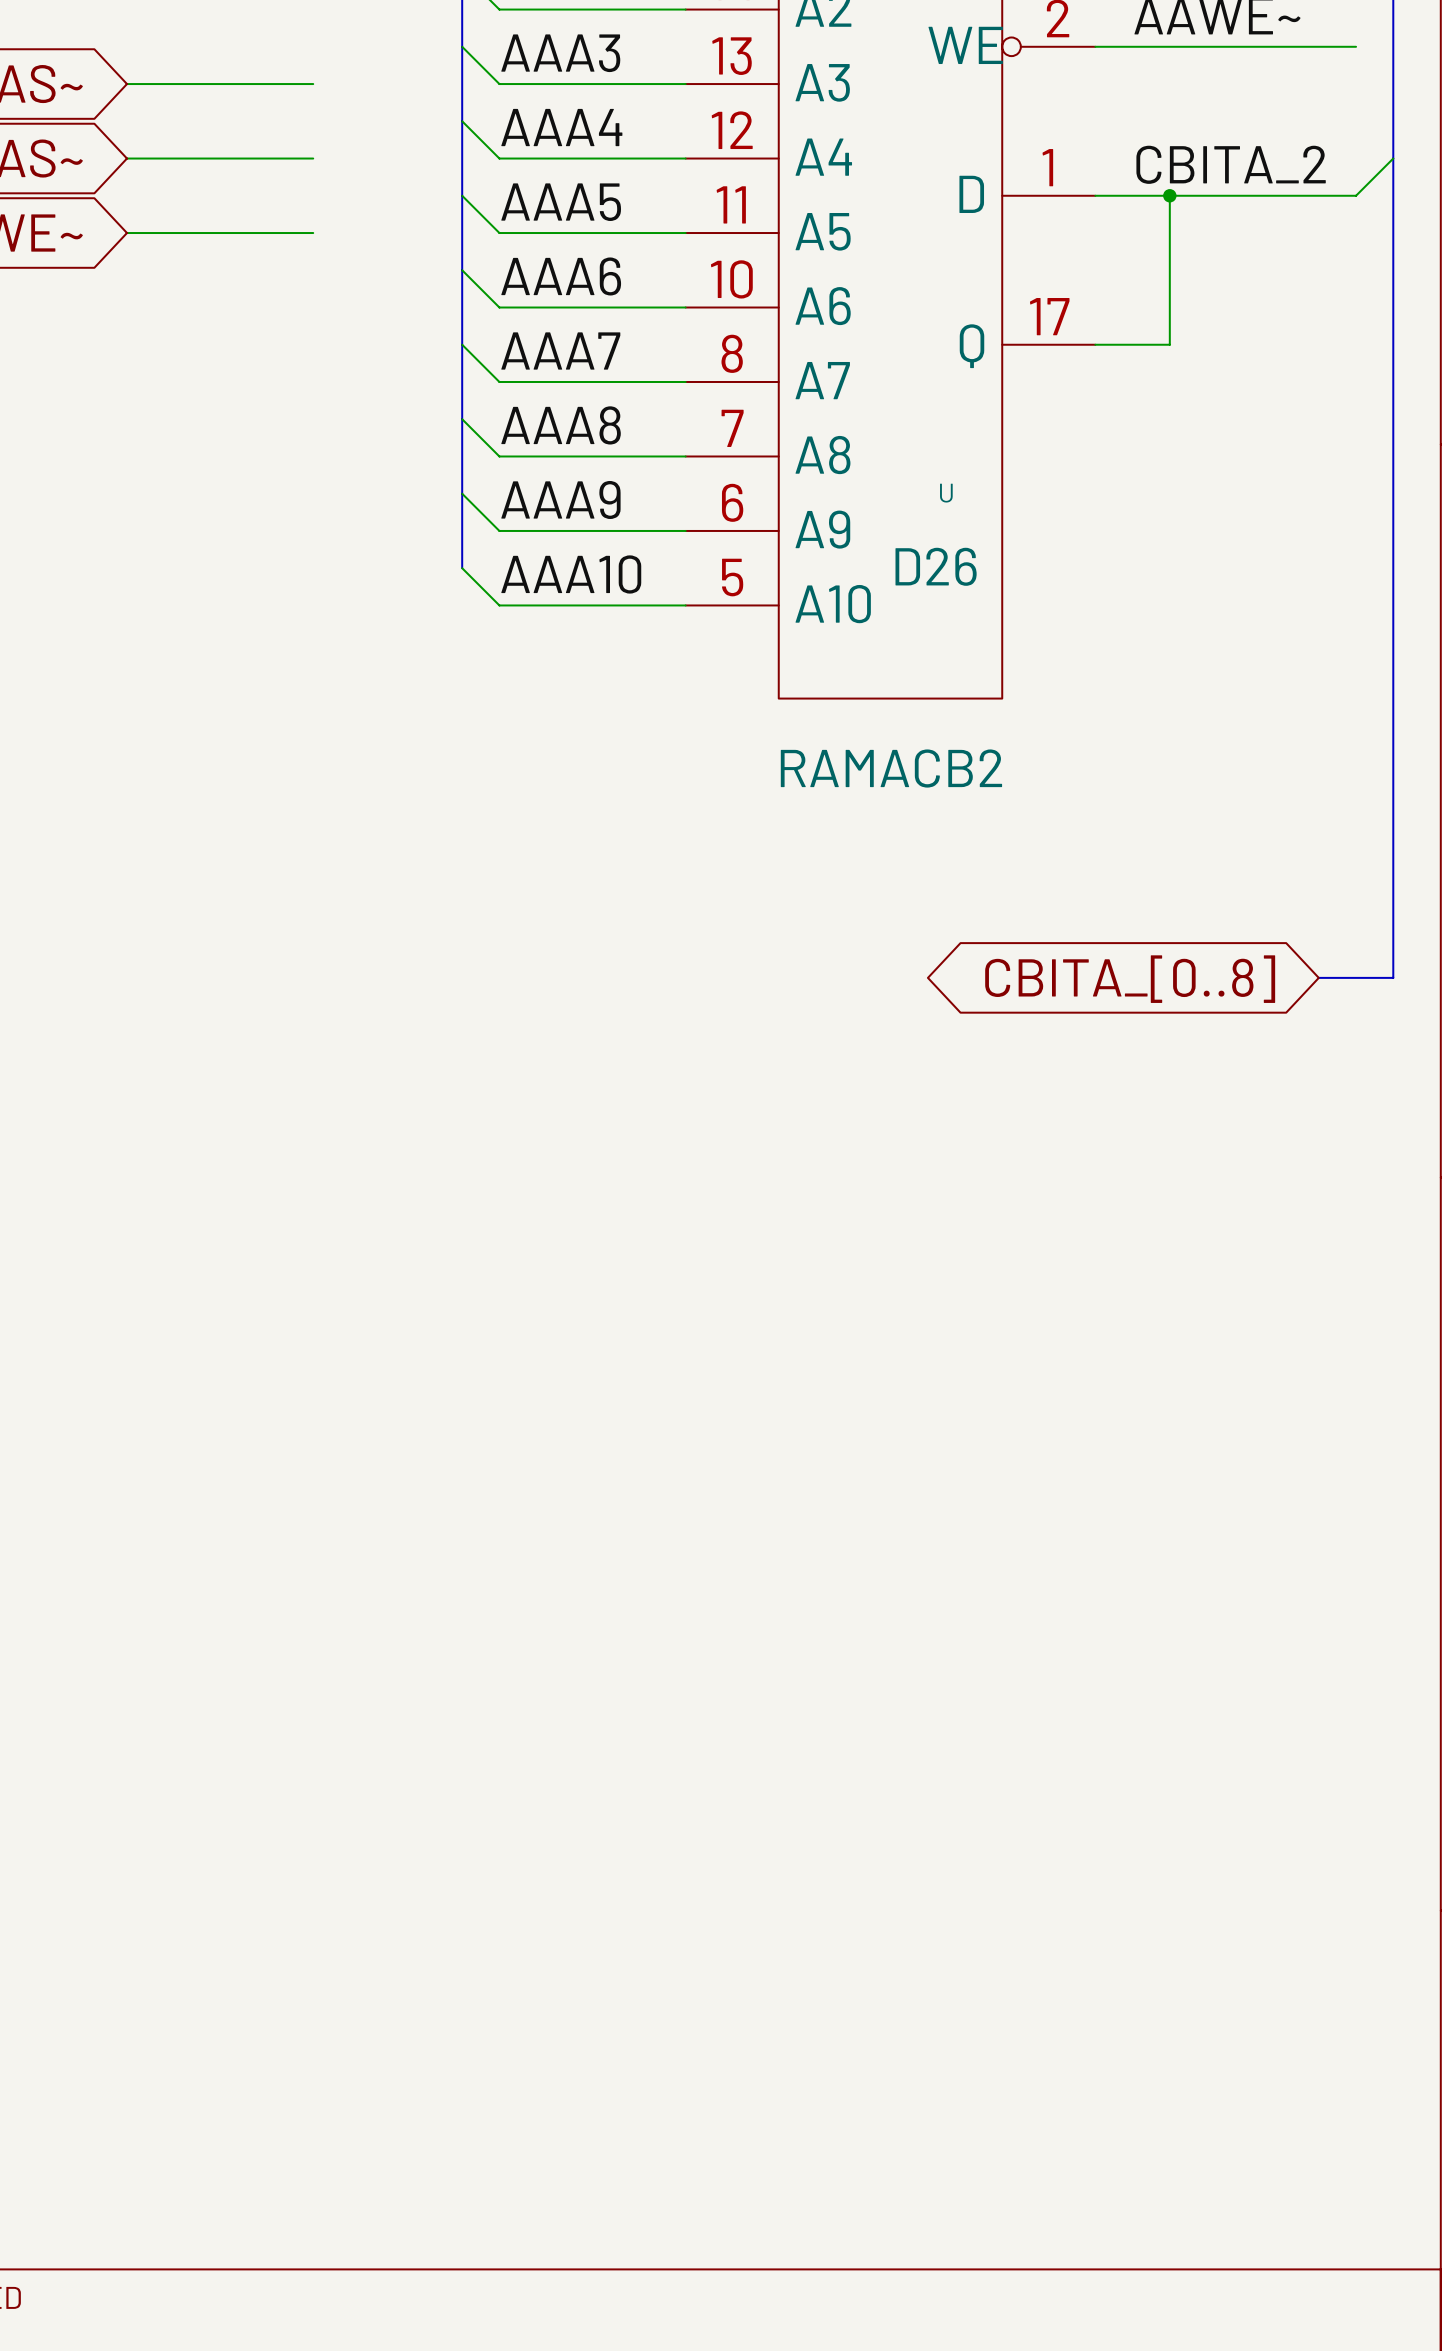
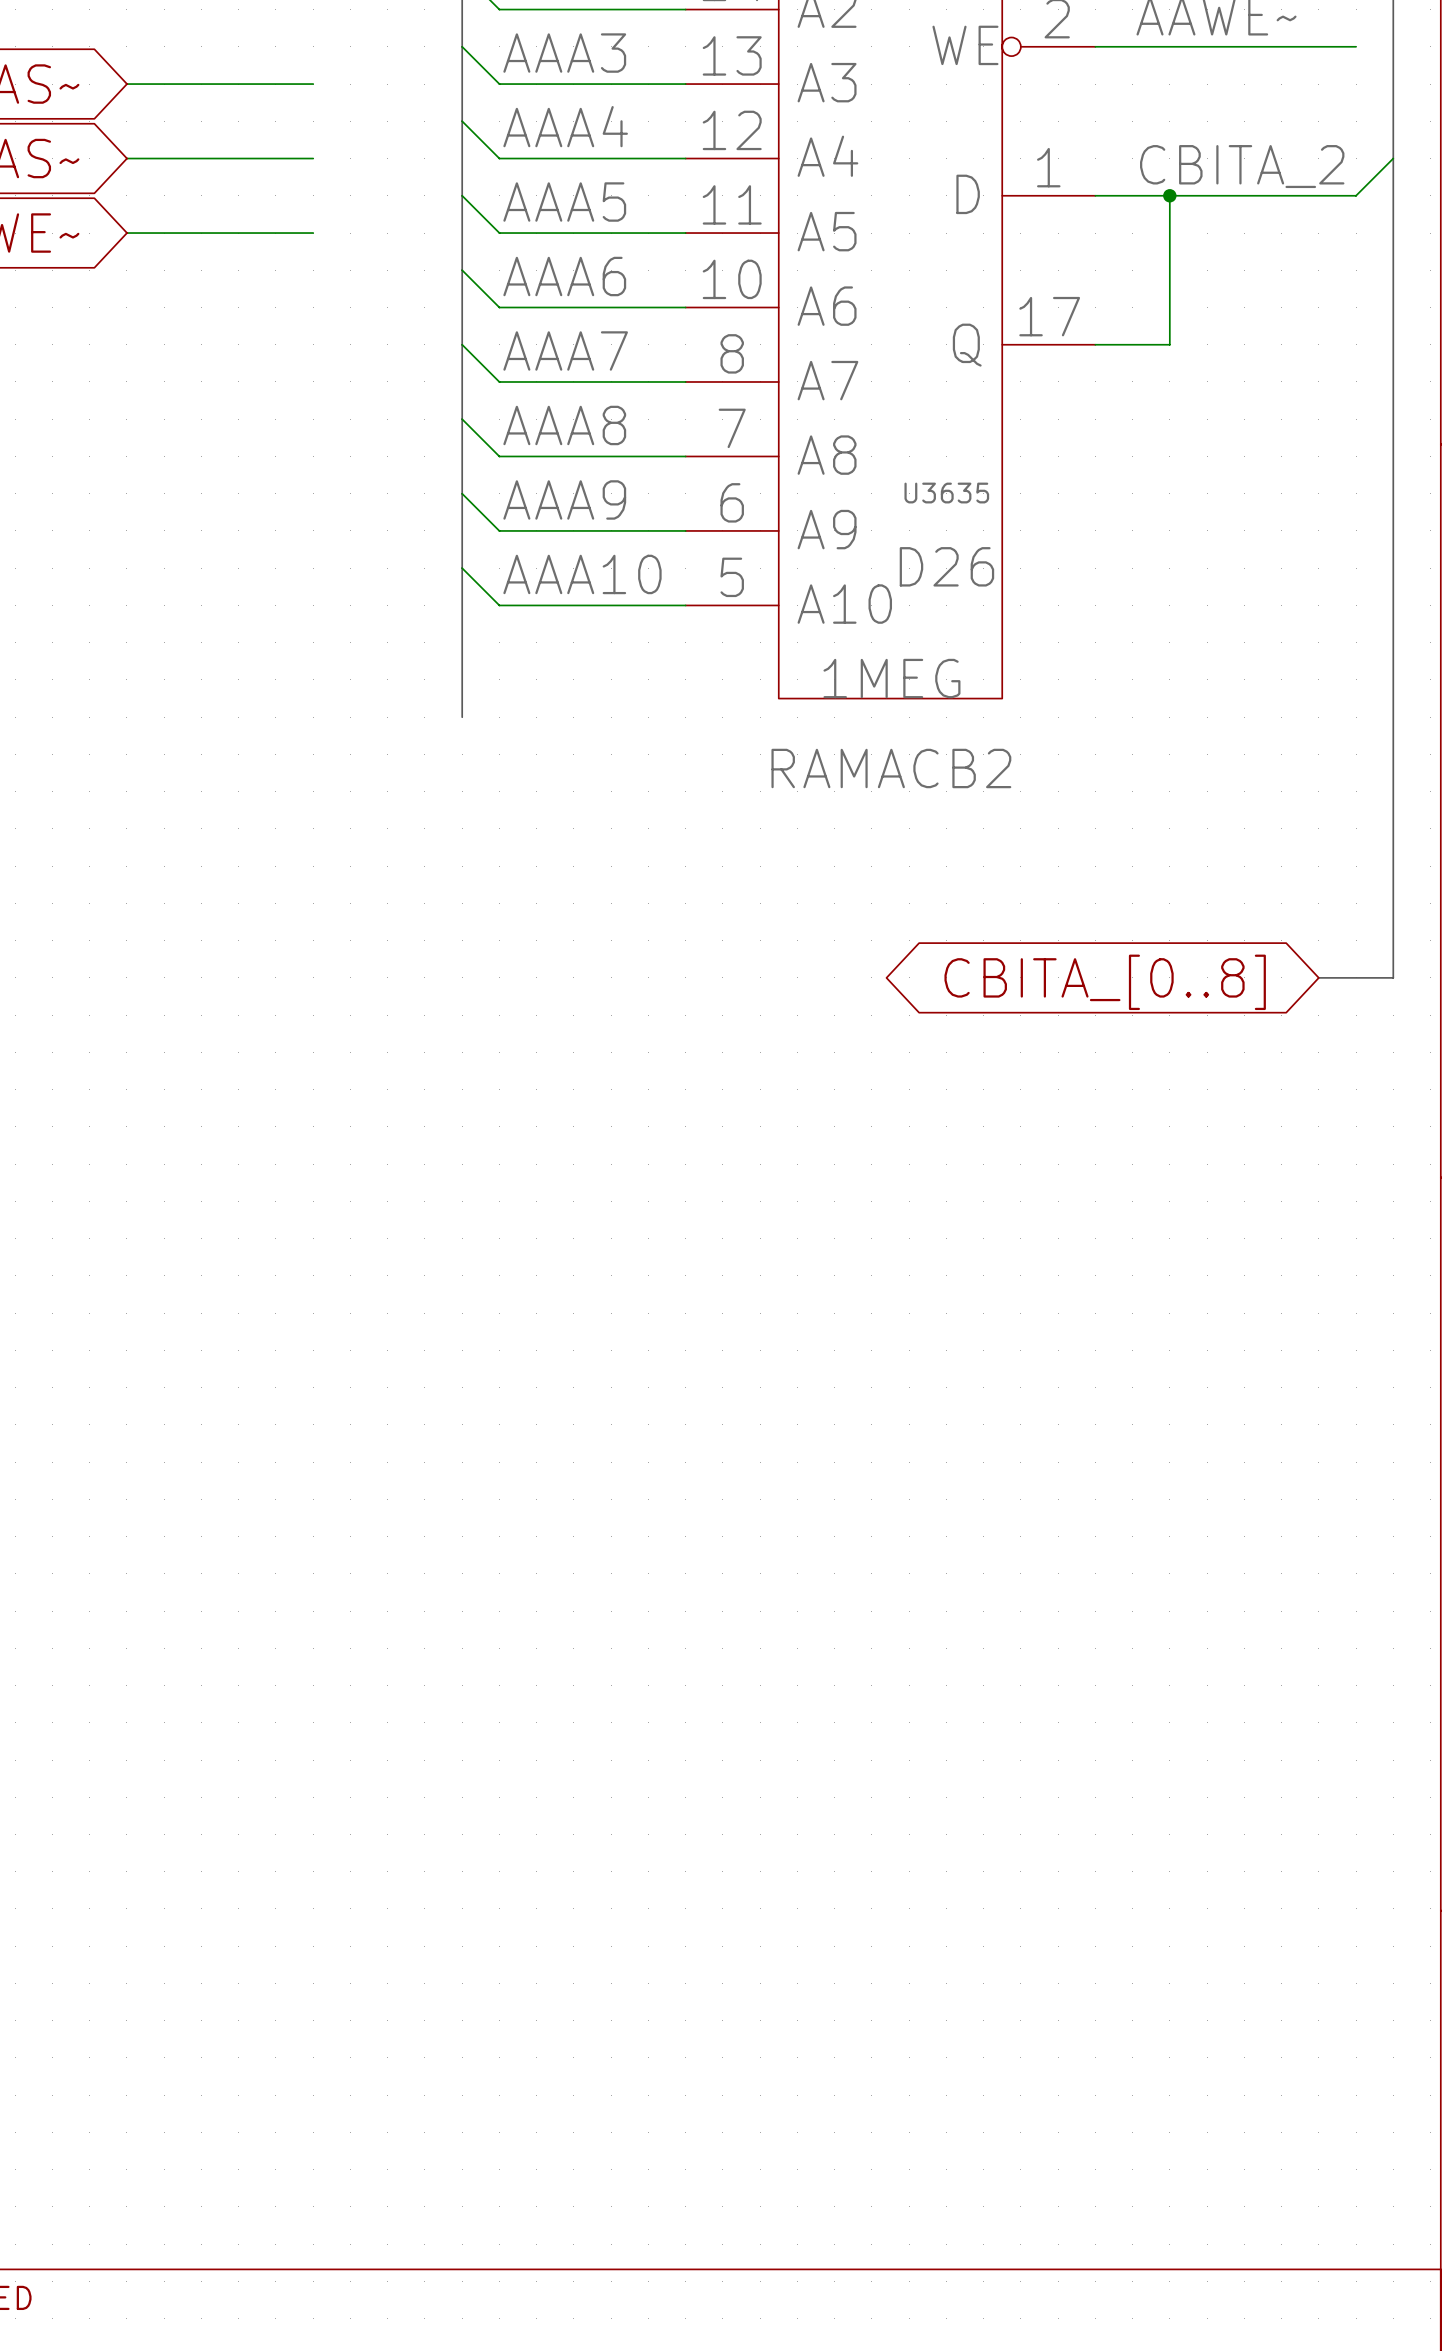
U name: U (946, 493) -> U3635 (946, 493)
bus: none -> (462, 568) (462, 717)
U value: none -> 1MEG (891, 678)

